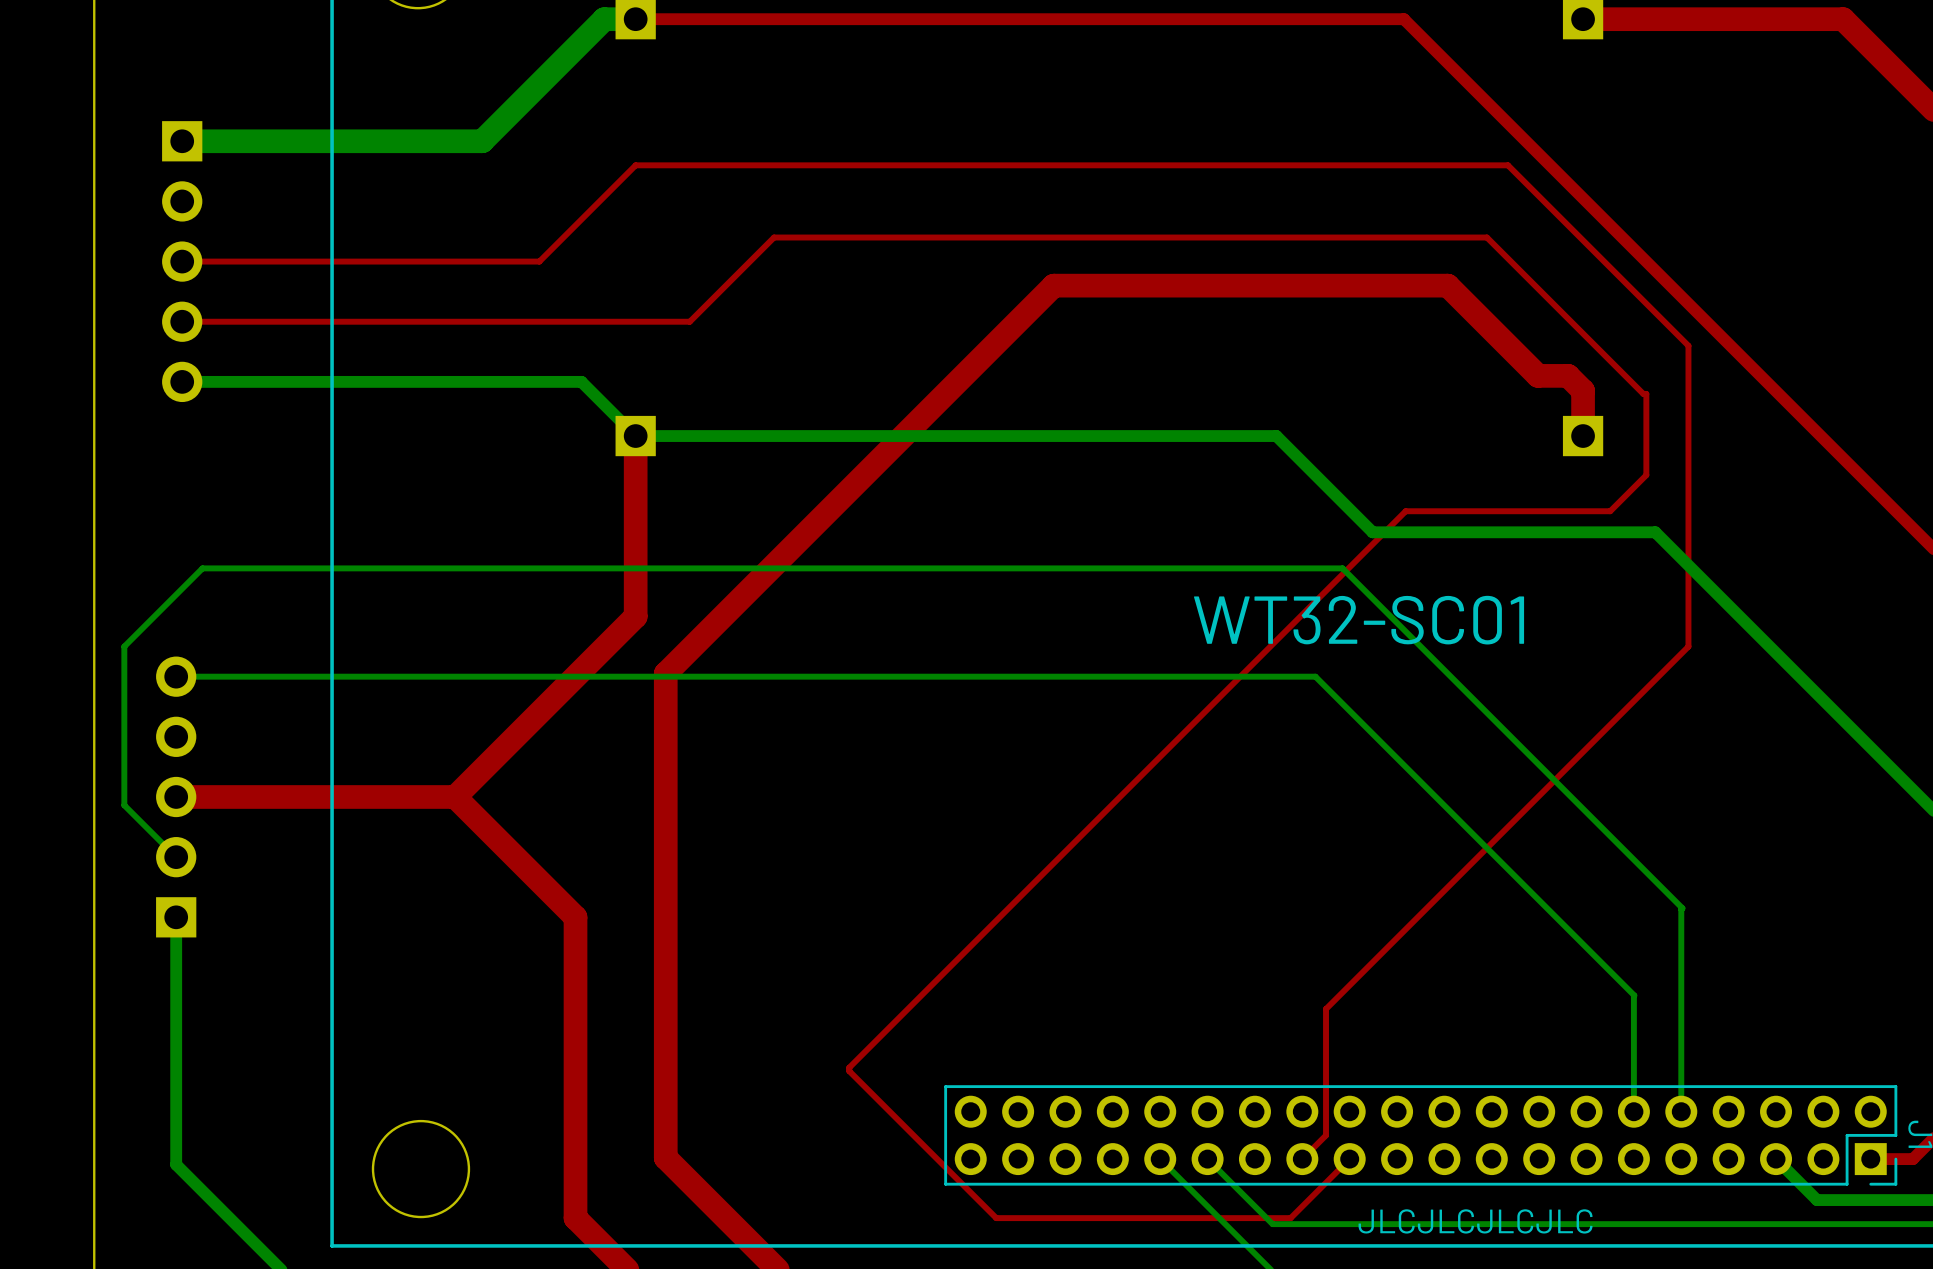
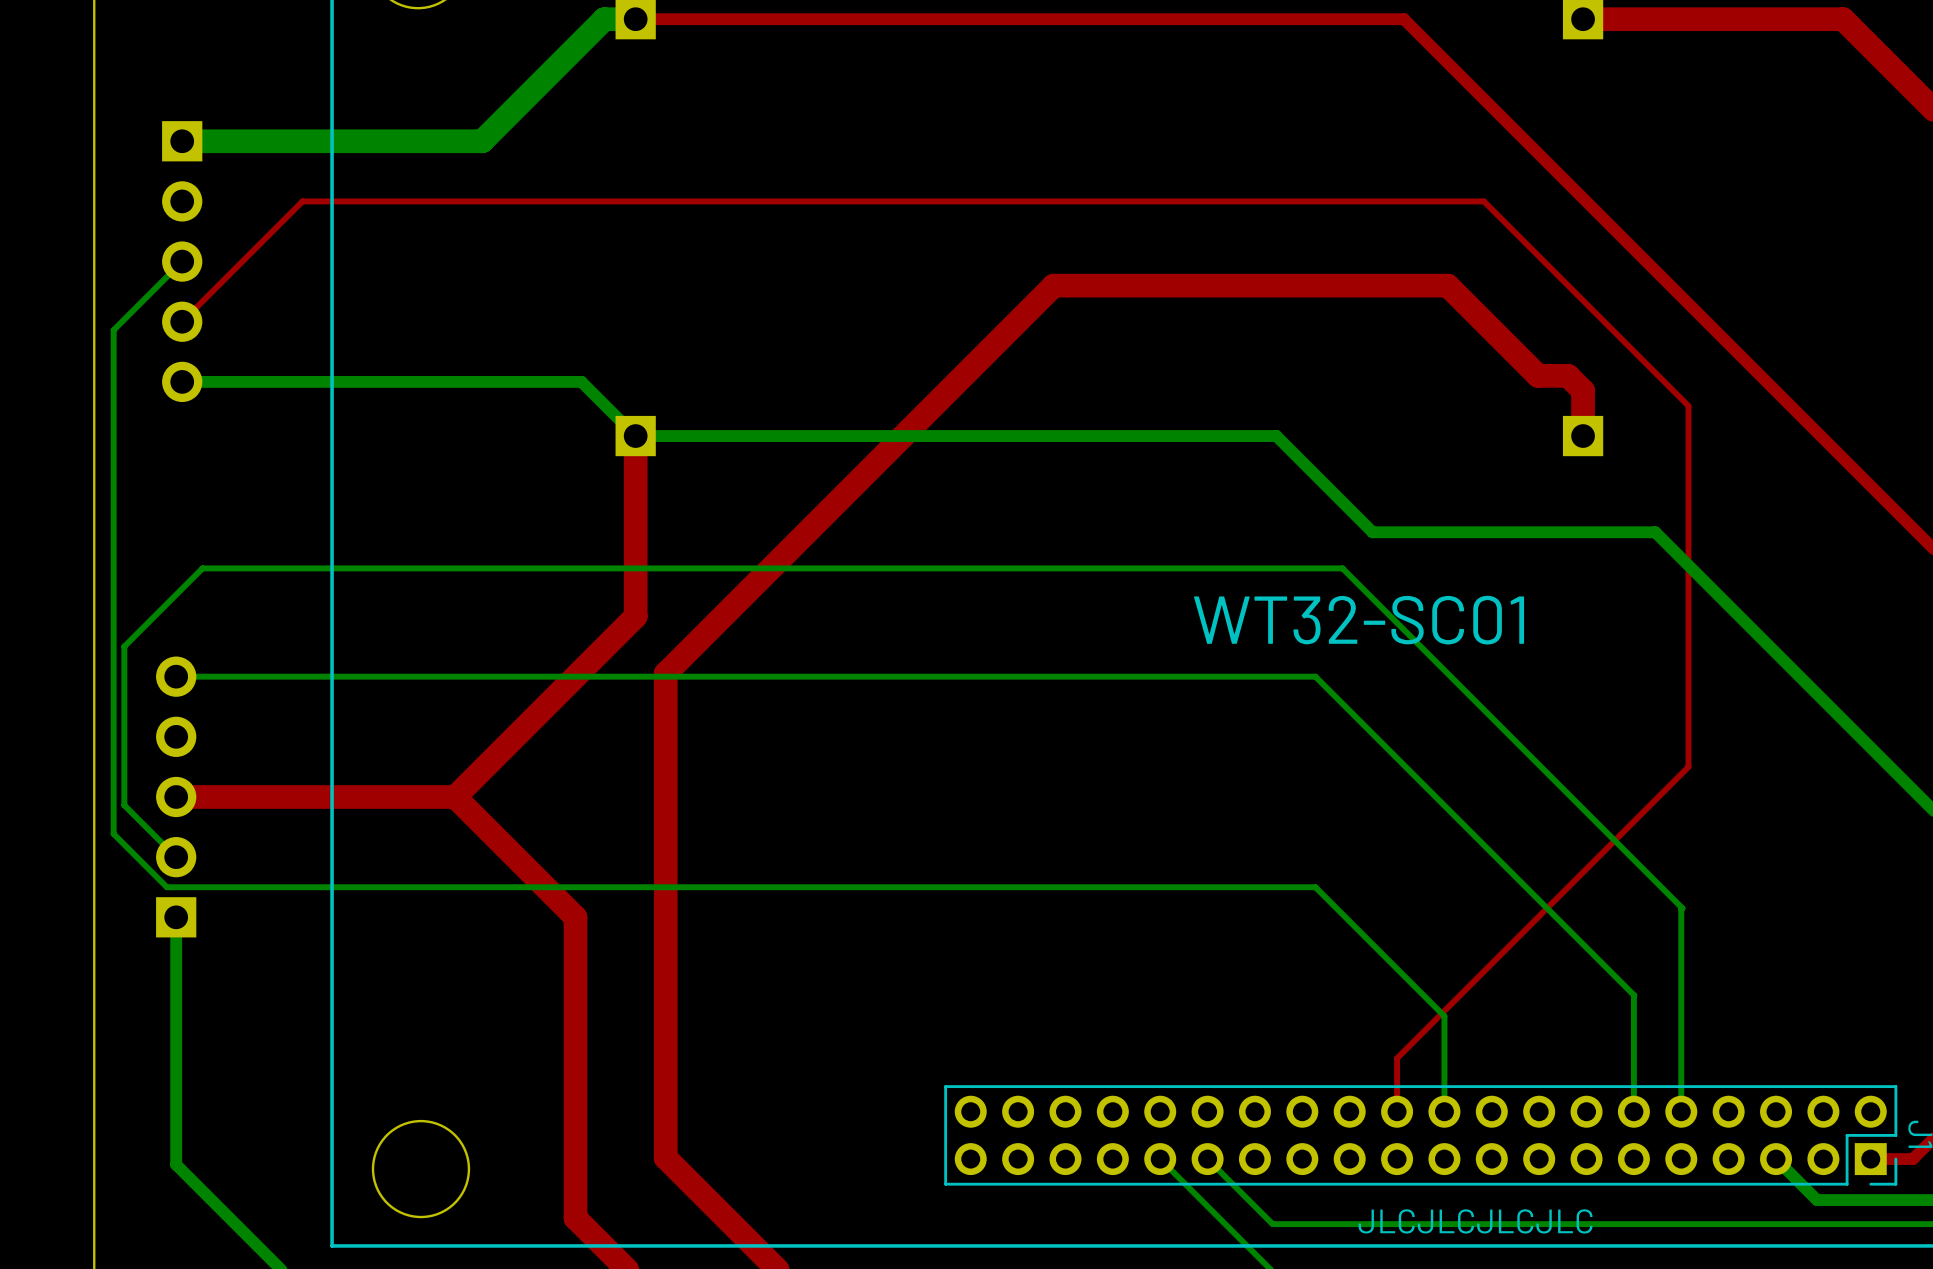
top track: (182, 261) (539, 261) (635, 165) (1507, 165) (1688, 345) (1688, 405) -> (182, 321) (302, 201) (1483, 201) (1688, 405)
bottom track: none -> (182, 261) (113, 330) (113, 833) (166, 887) (1315, 887) (1444, 1016) (1444, 1111)
top track: (182, 321) (689, 321) (774, 237) (1486, 237) (1643, 393) (1646, 393) (1646, 475) (1610, 511) (1405, 511) (849, 1067) (849, 1071) (996, 1218) (1290, 1218) (1349, 1159) -> none
top track: (1688, 646) (1326, 1009) (1326, 1135) (1302, 1159) -> (1688, 646) (1688, 766) (1397, 1058) (1397, 1111)

